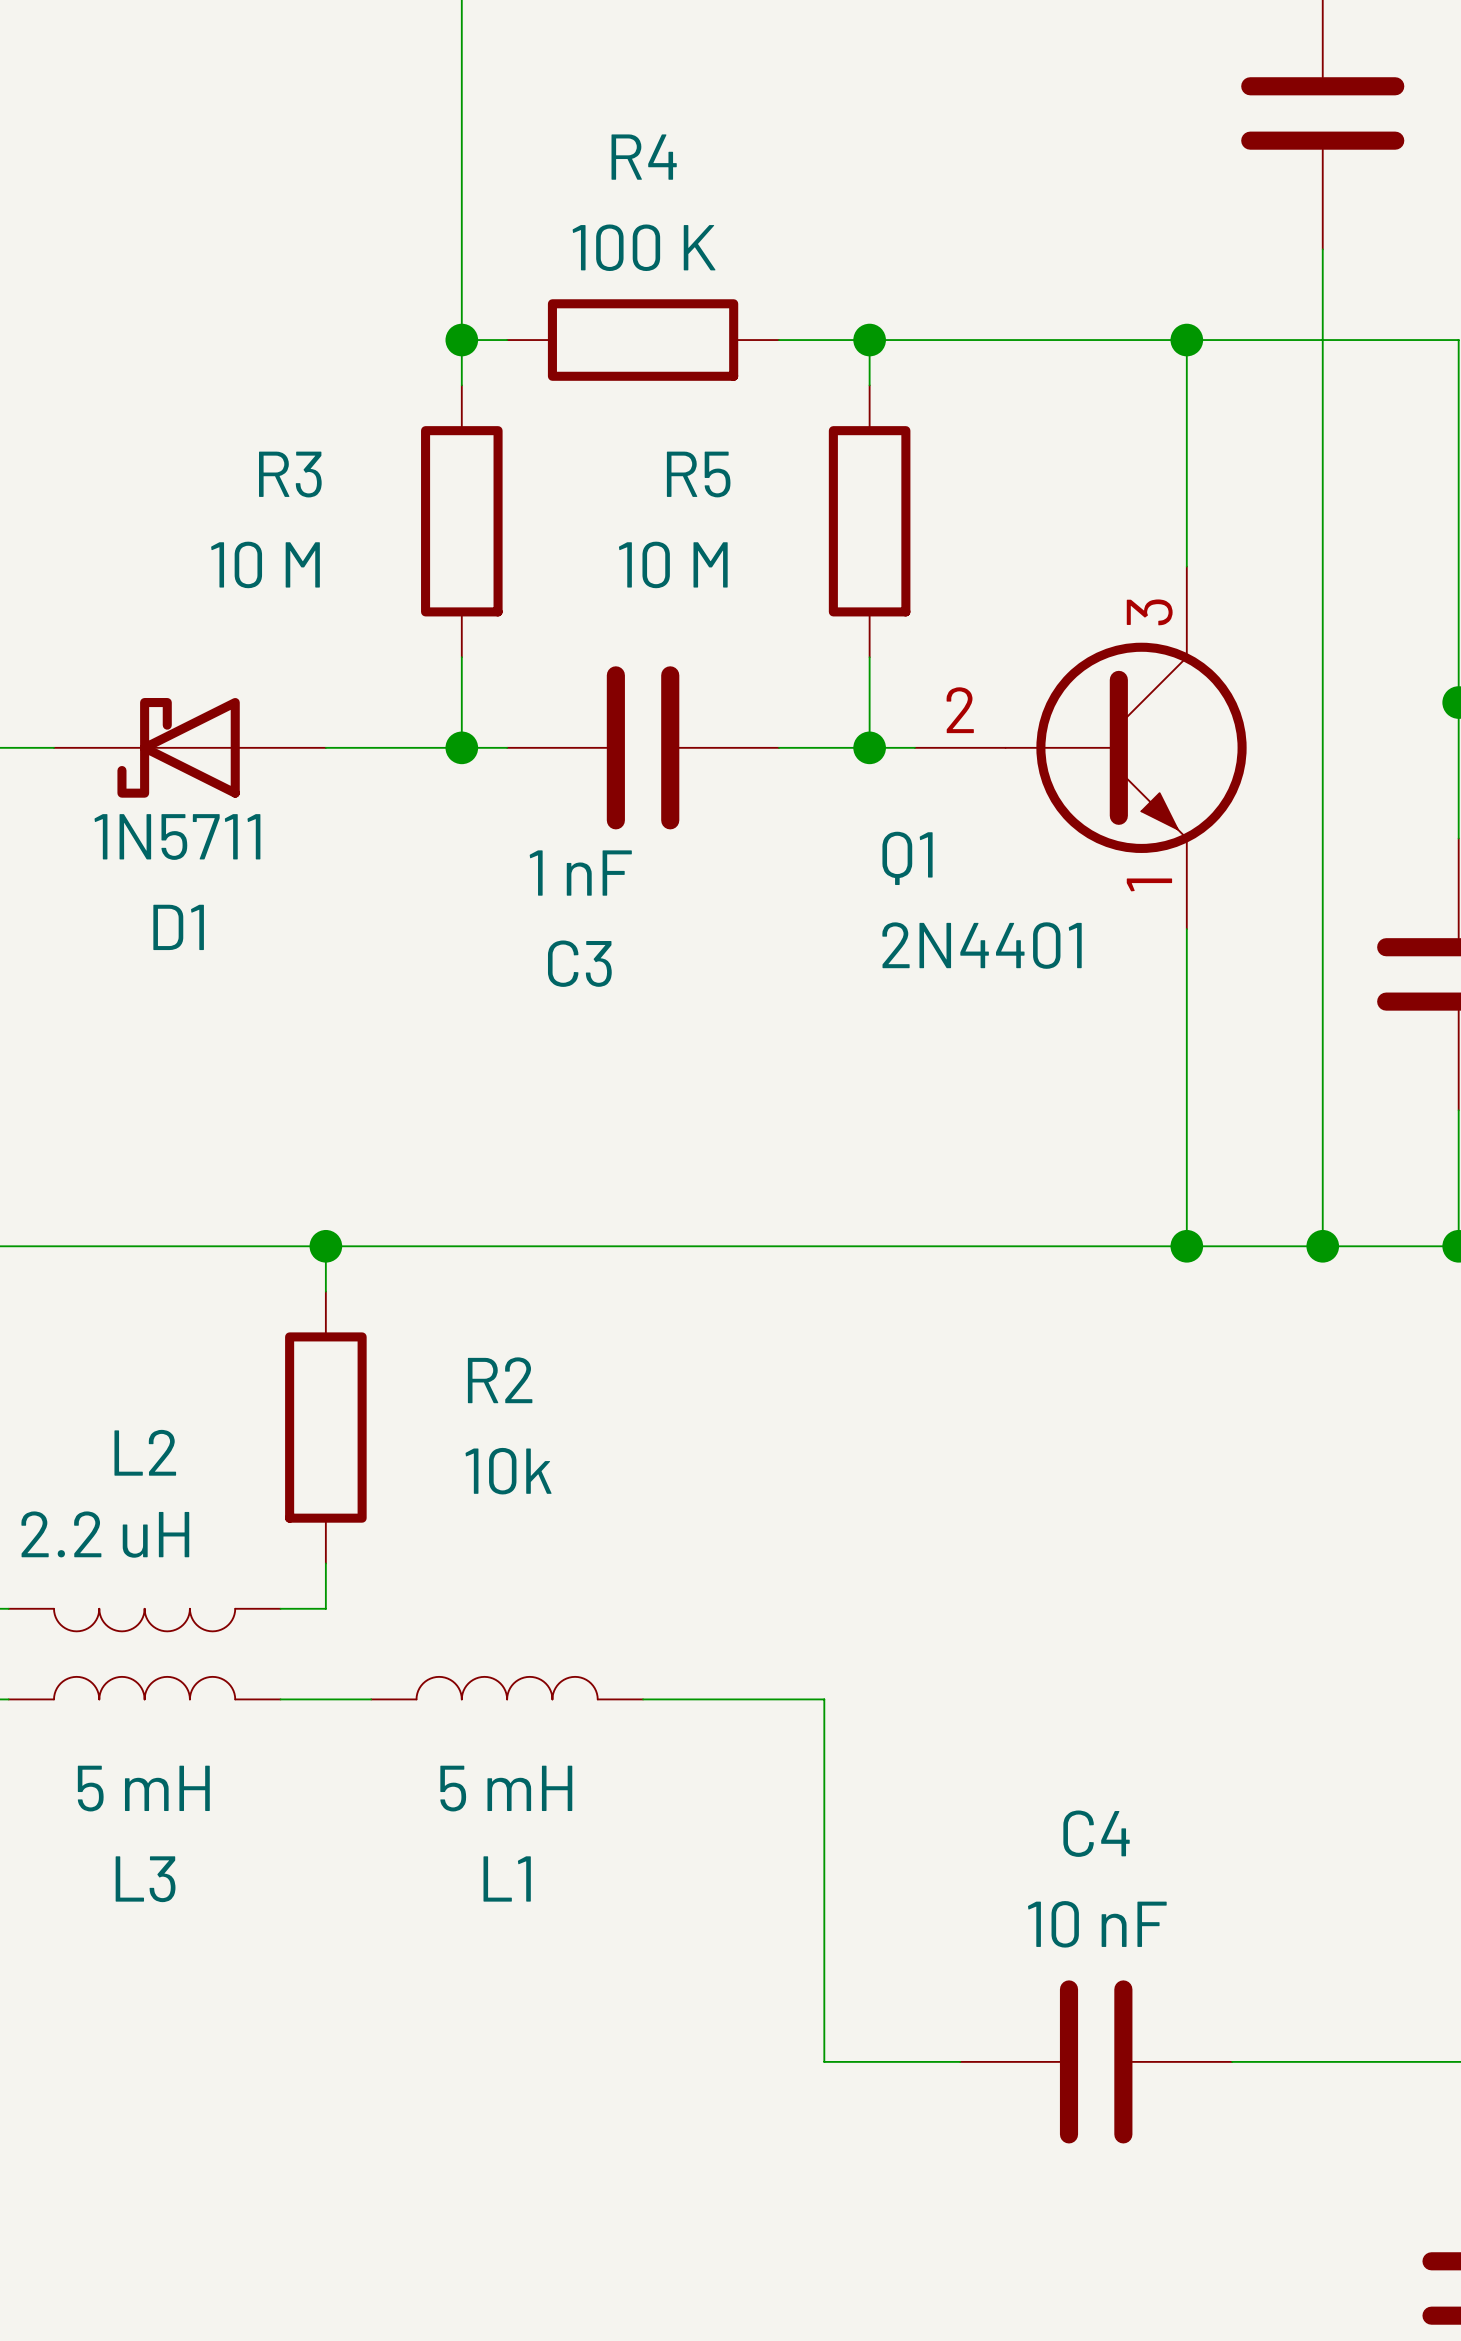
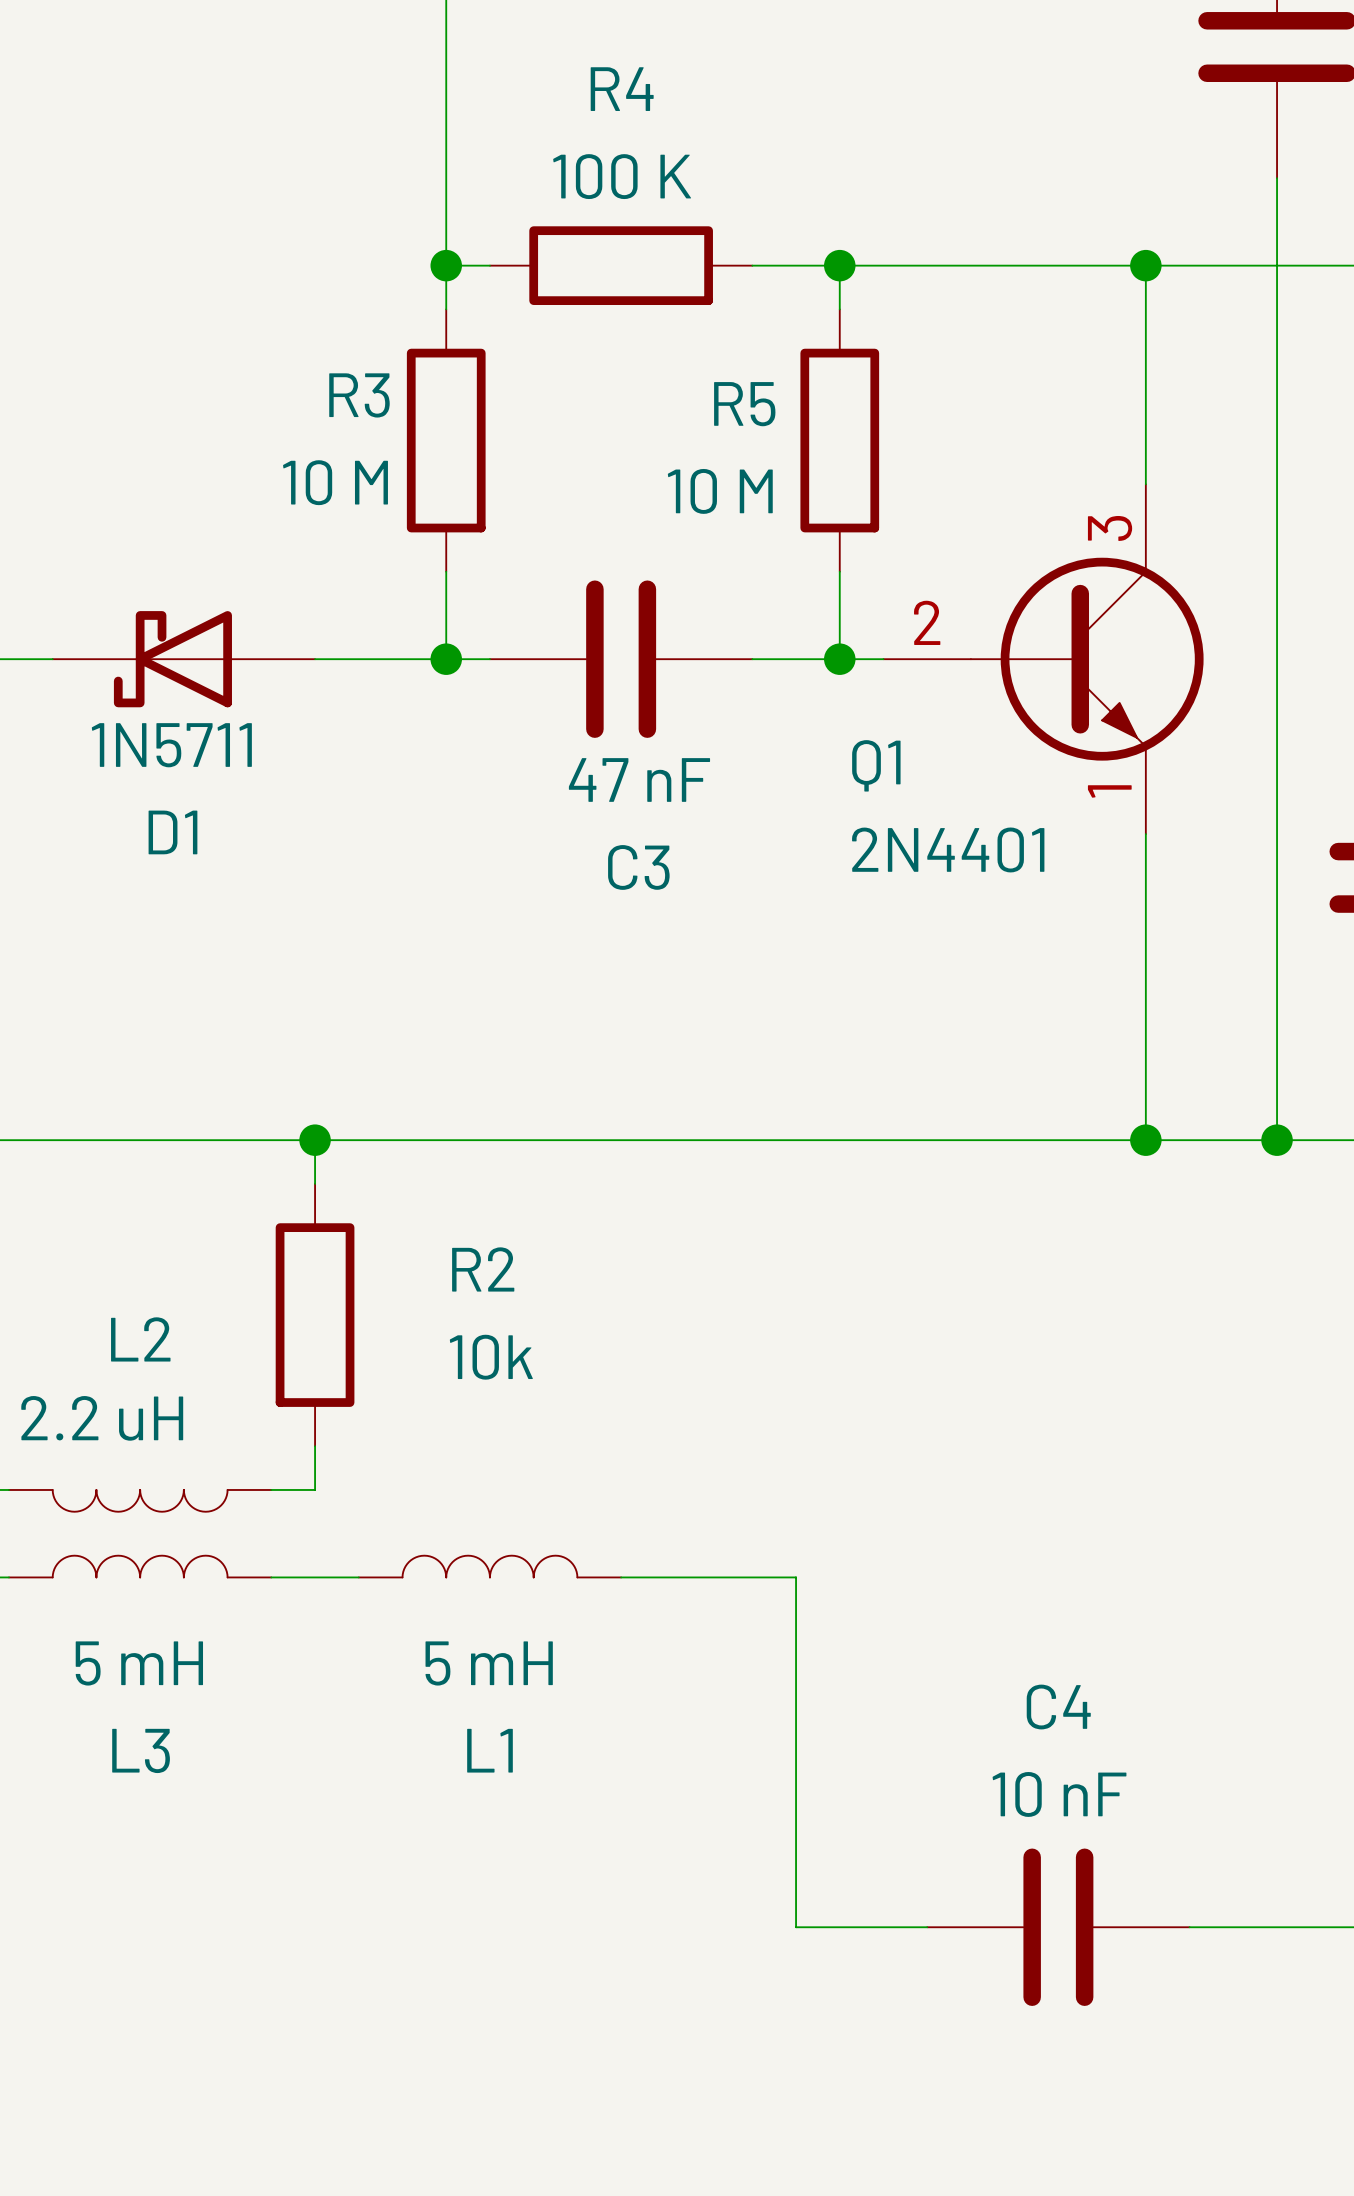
R3 name position: R3 (290, 474) -> R3 (359, 395)
R5 name position: R5 (698, 474) -> R5 (744, 404)
R3 value position: 10 M (265, 564) -> 10 M (335, 482)
R5 value position: 10 M (673, 564) -> 10 M (720, 491)
C3 value: 1 nF (580, 873) -> 47 nF (639, 779)
C3 name position: C3 (579, 963) -> C3 (638, 867)

